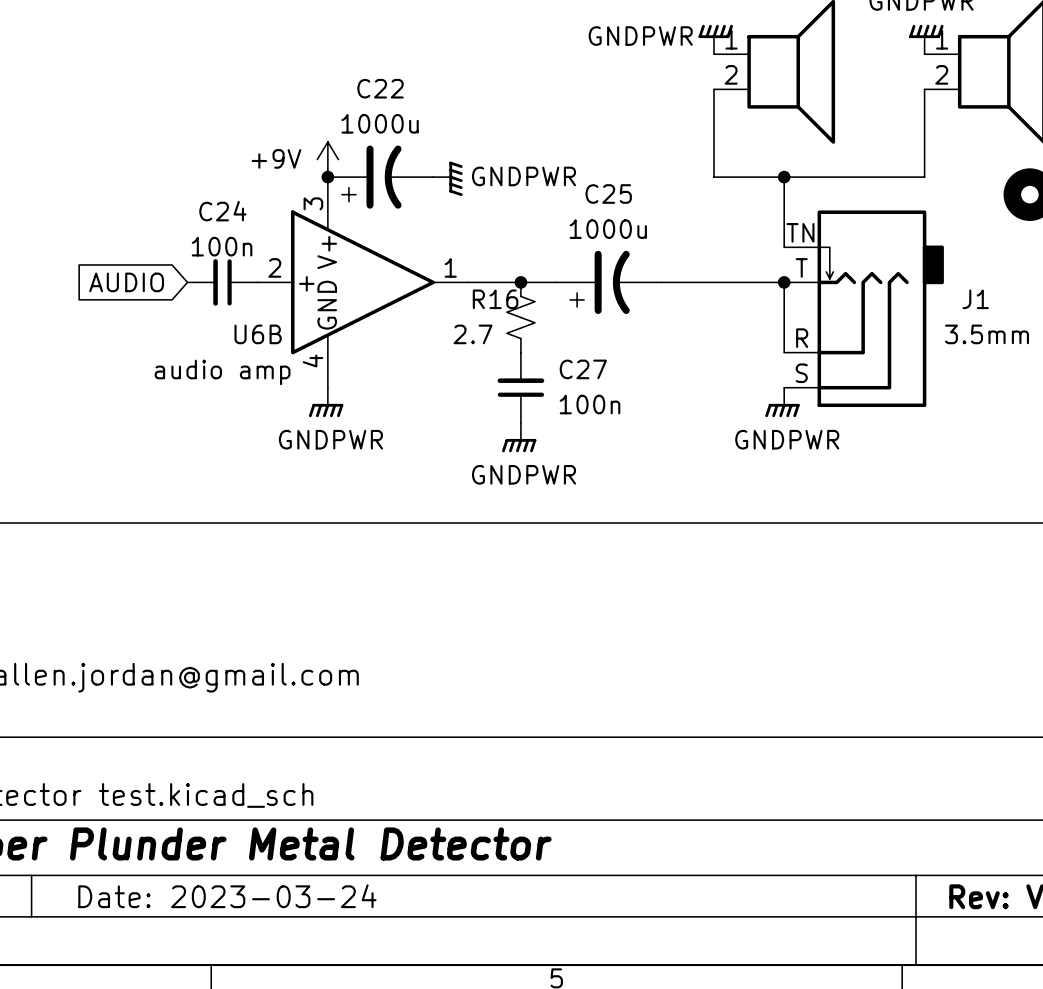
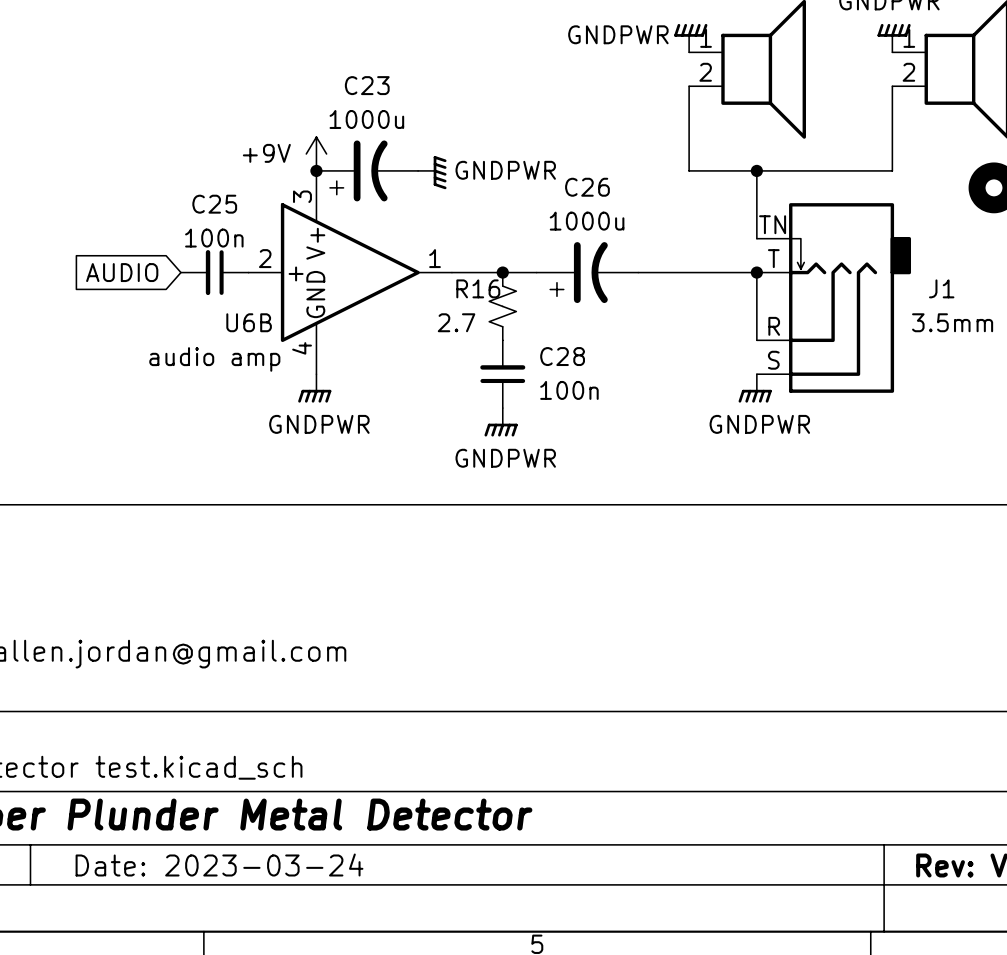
C22 name: C22 (380, 88) -> C23 (367, 85)
C25 name: C25 (608, 194) -> C26 (587, 187)
C24 name: C24 (222, 211) -> C25 (214, 204)
C27 name: C27 (583, 369) -> C28 (562, 356)

